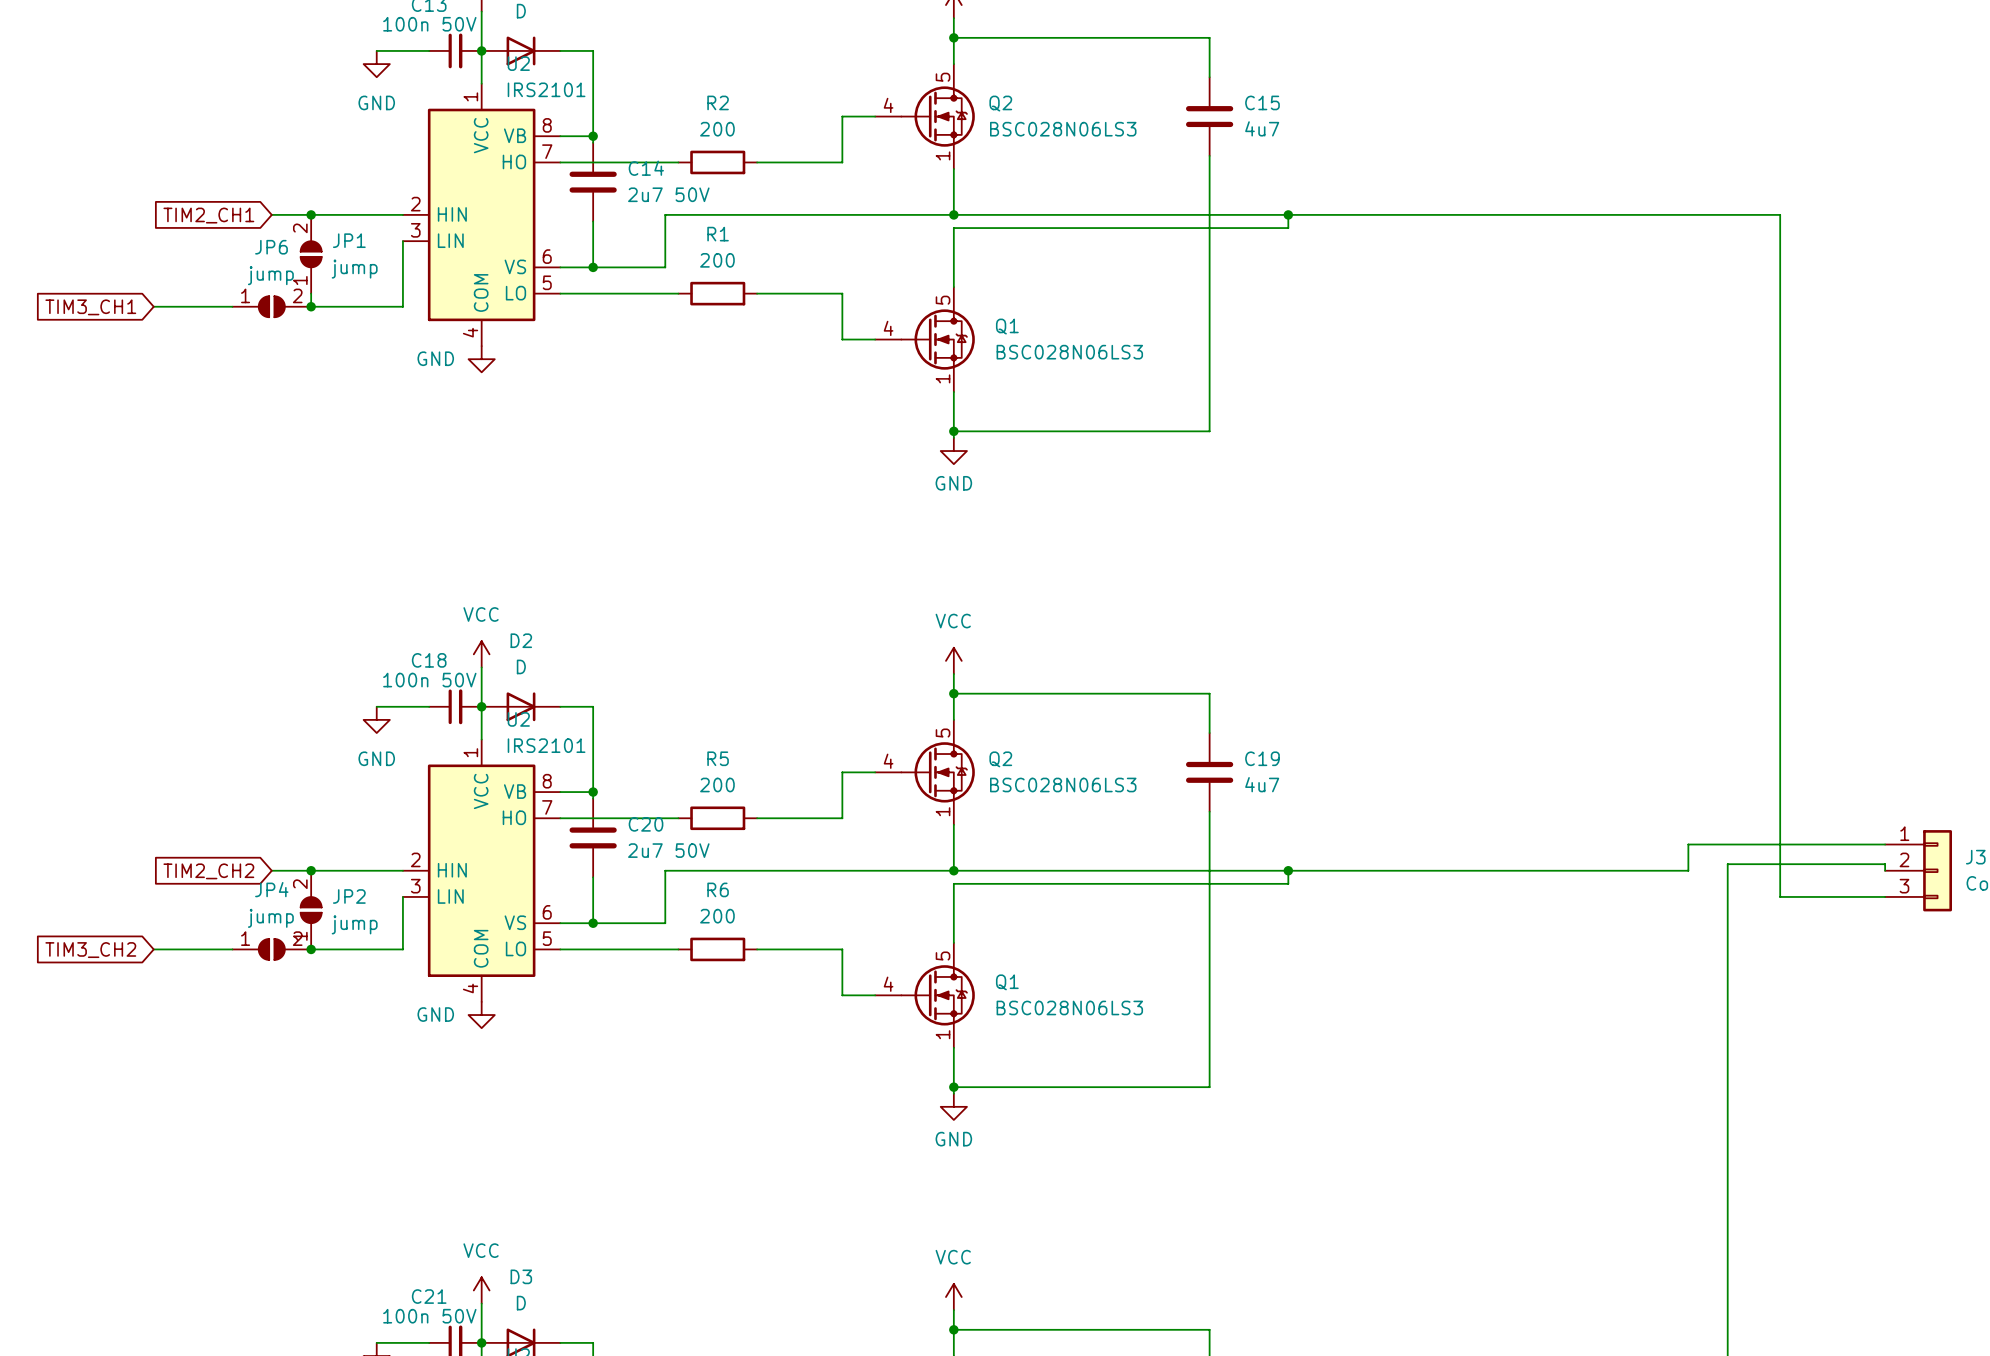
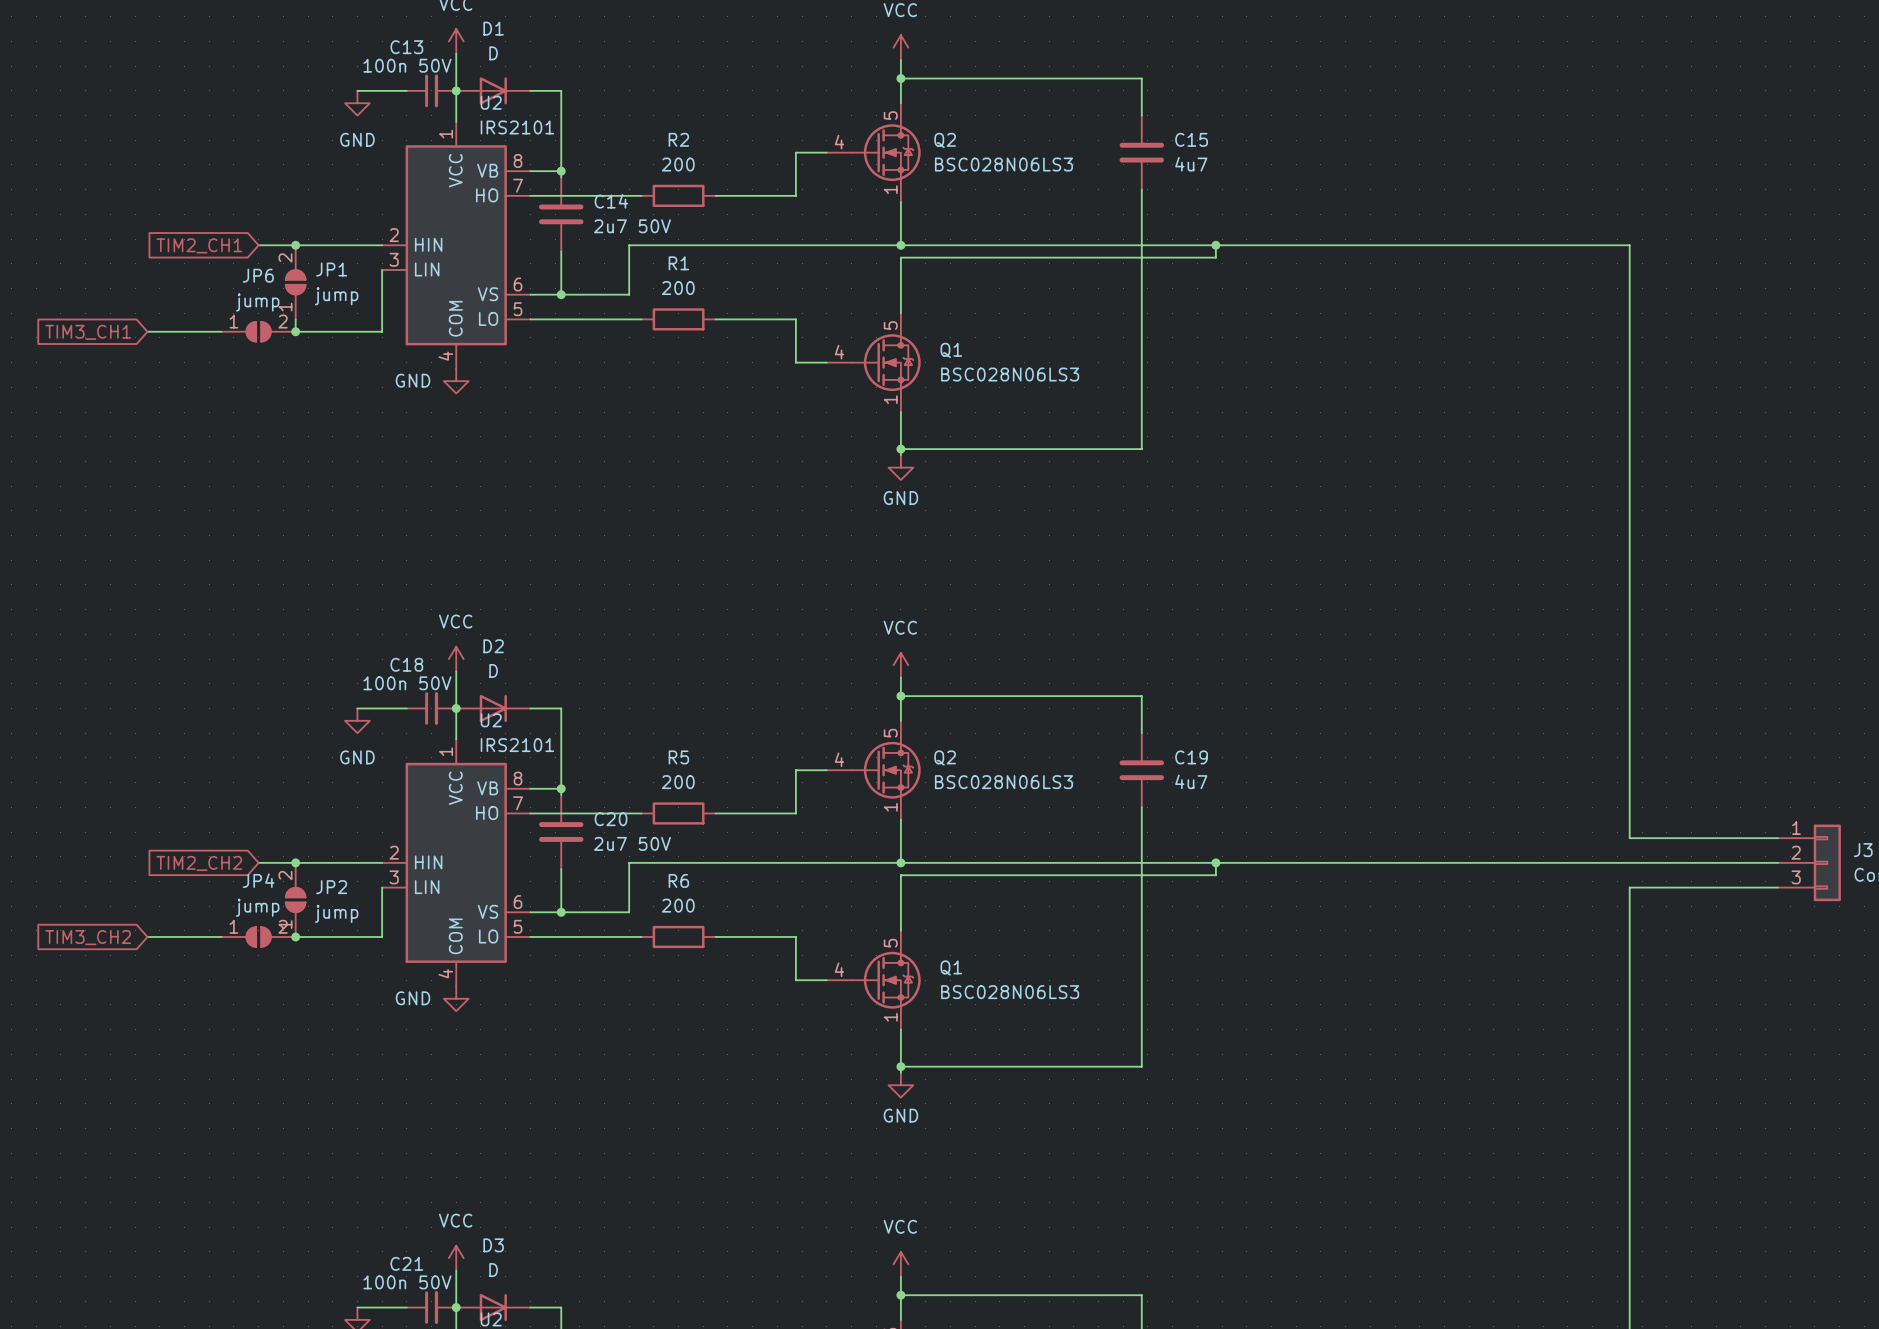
wire: (1727, 214) (1780, 214) (1780, 896) -> (1629, 245) (1629, 838)
wire: (1727, 844) (1688, 844) (1688, 870) -> none
wire: (1885, 870) (1885, 864) (1727, 864) (1727, 896) -> (1777, 862) (1592, 862)
wire: none -> (1629, 887) (1679, 887)

